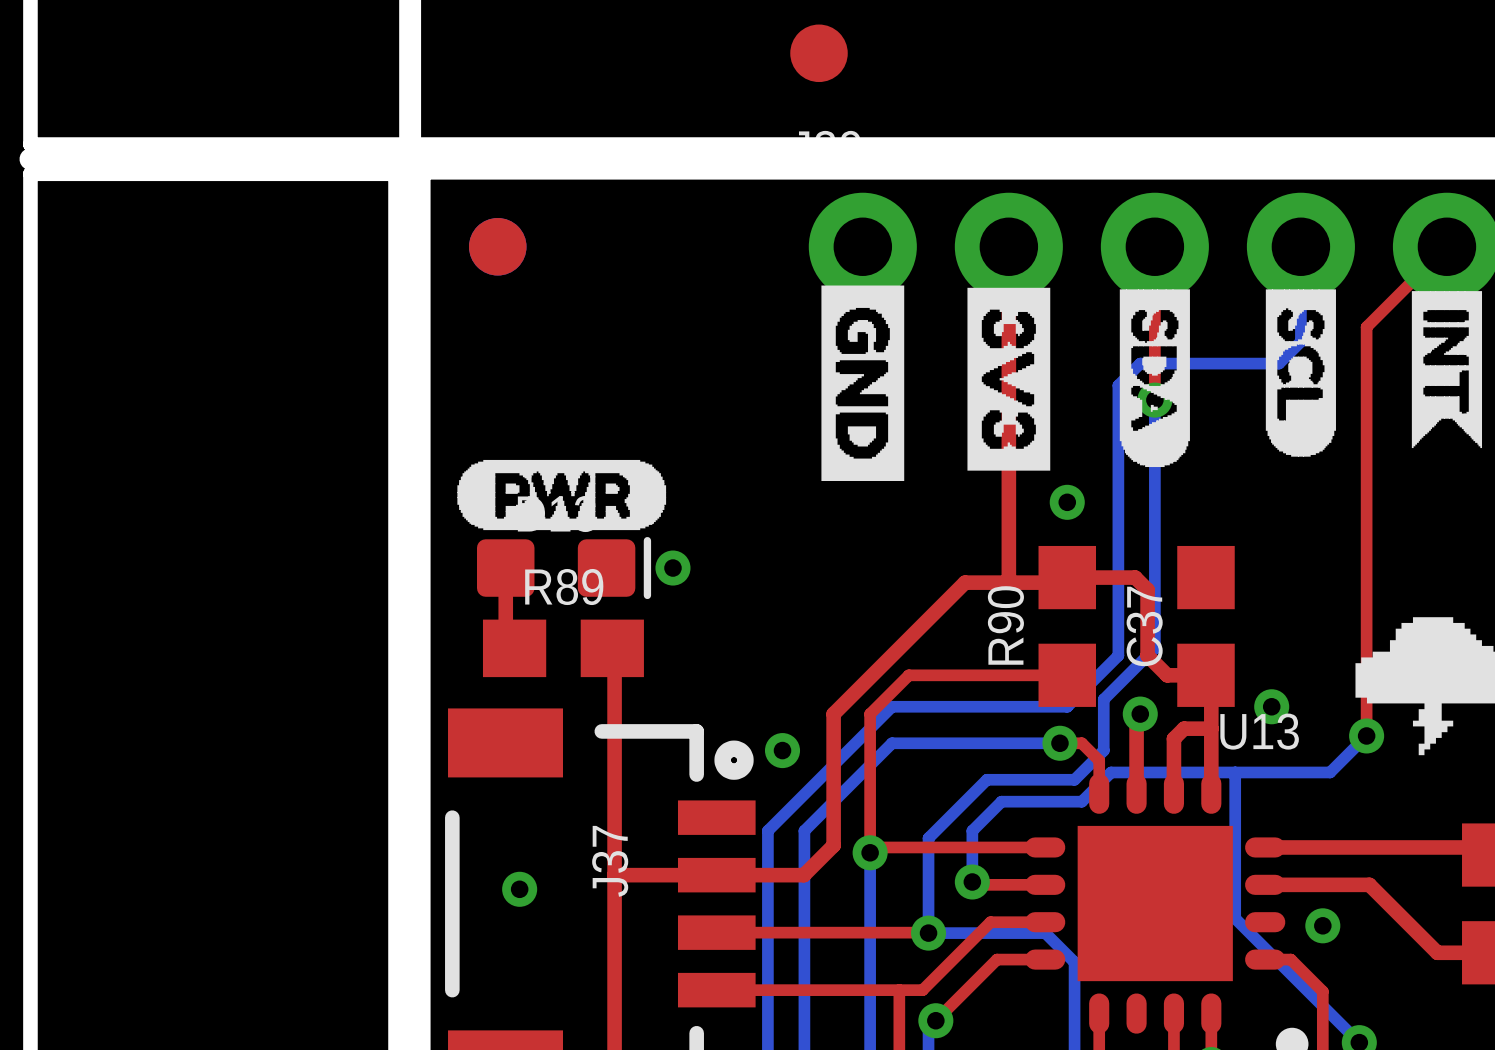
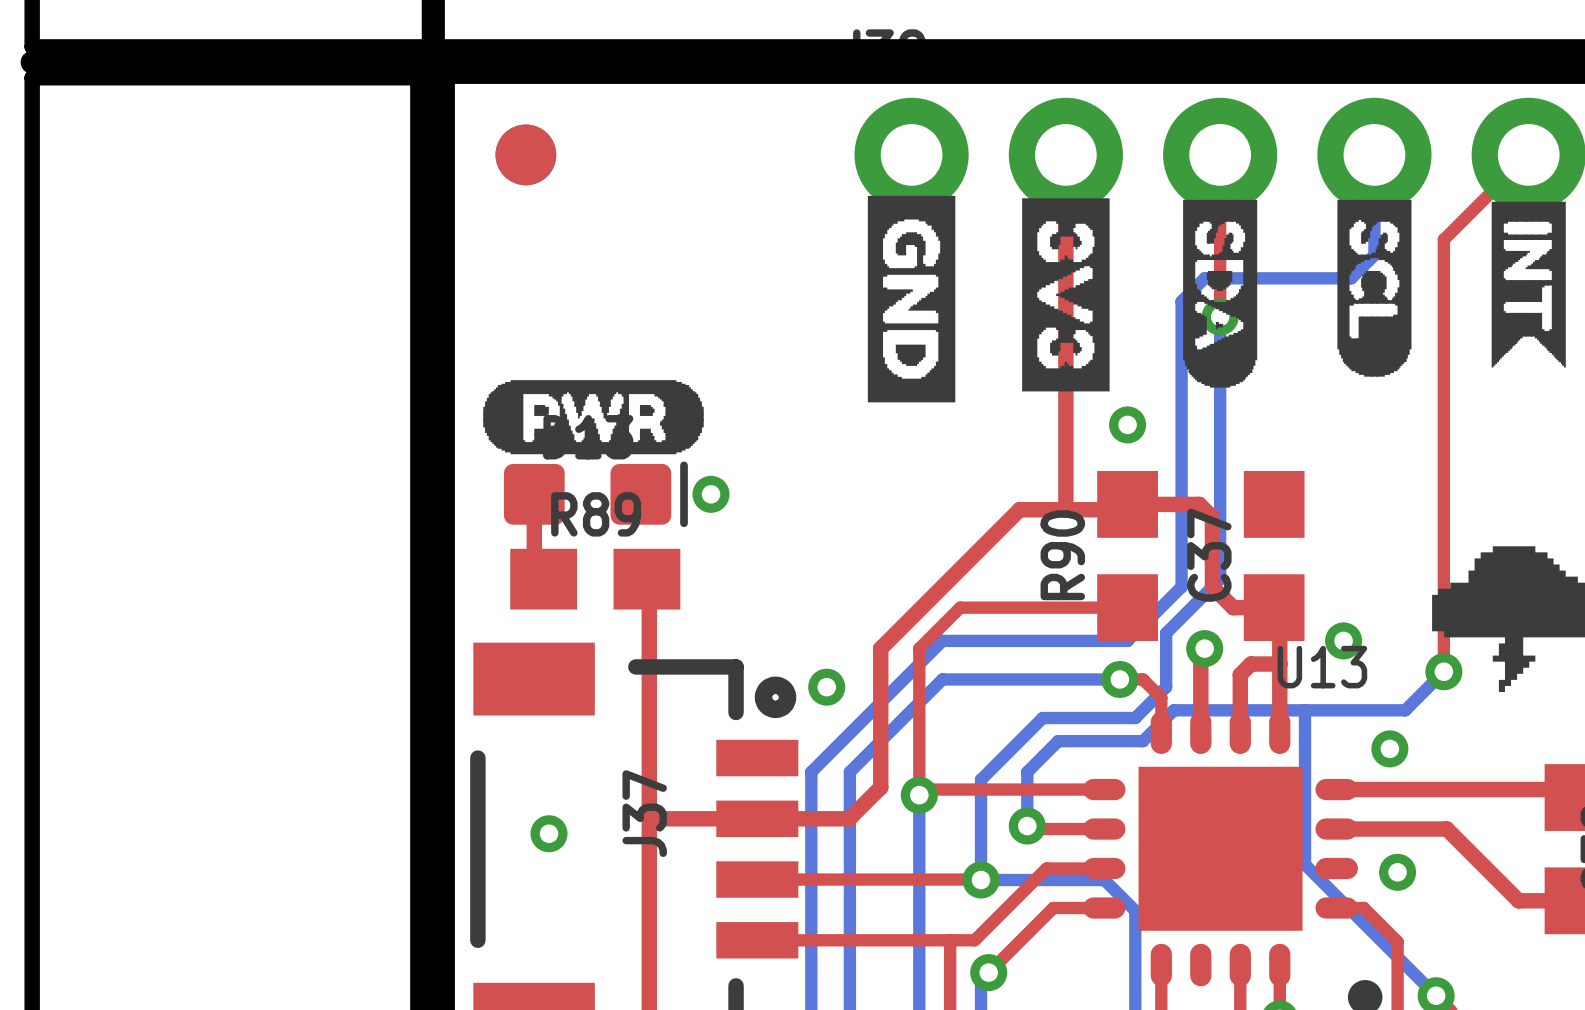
via: none -> (1389, 748)

